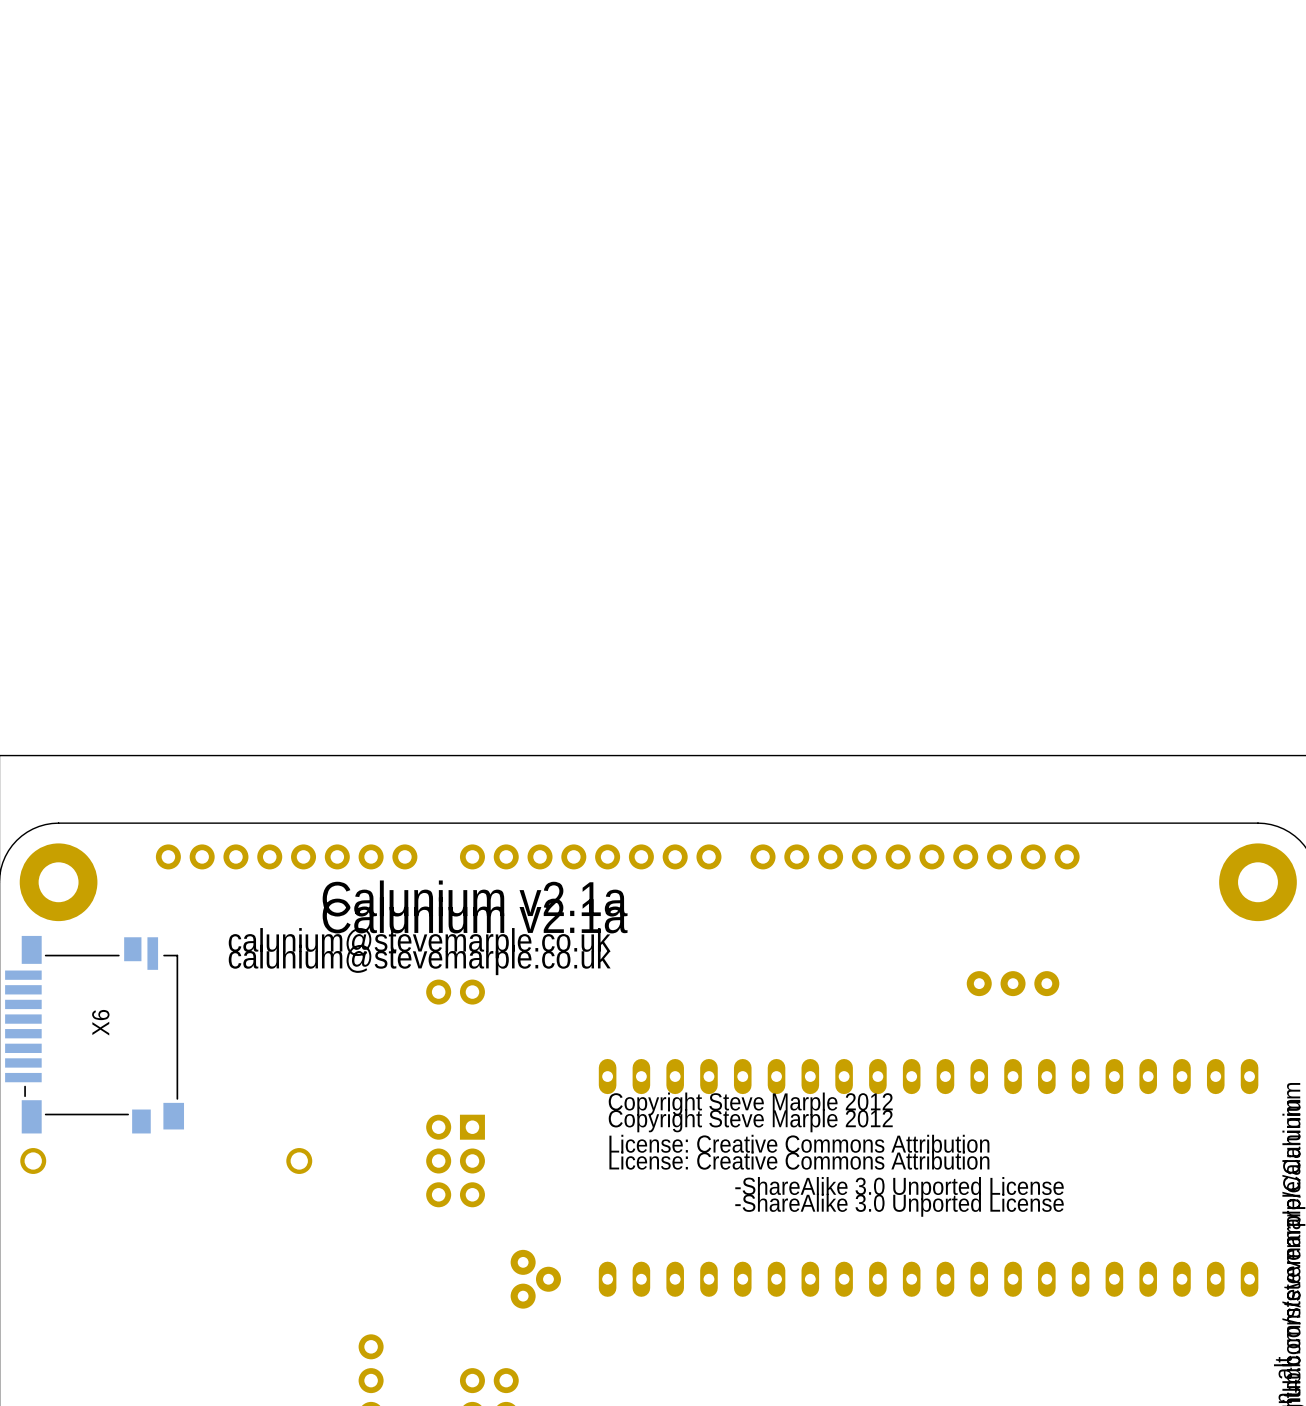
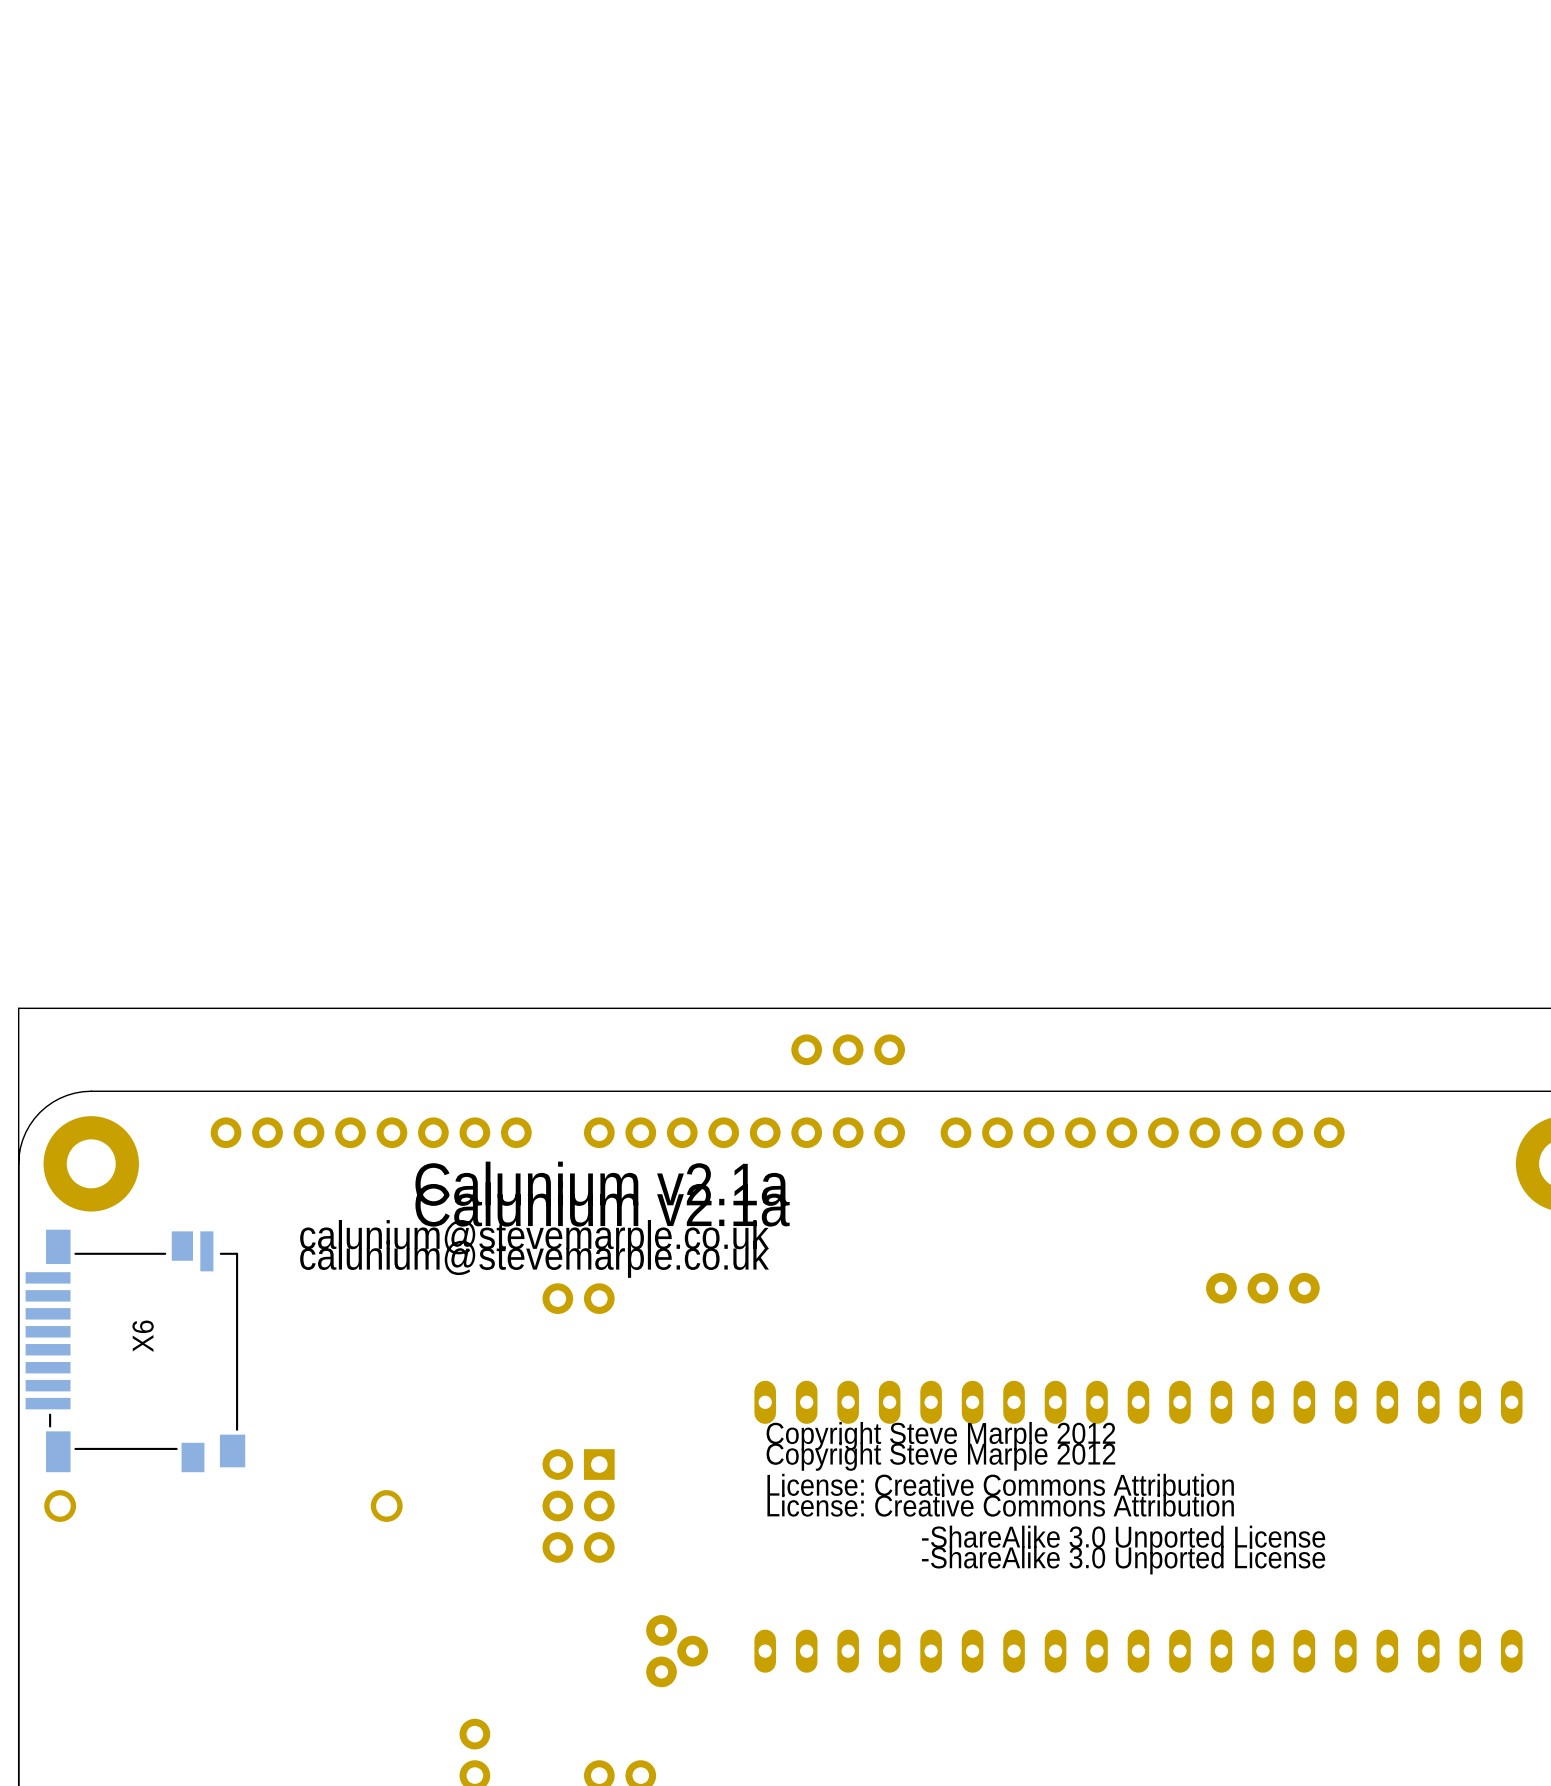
part: none -> (848, 1049)

